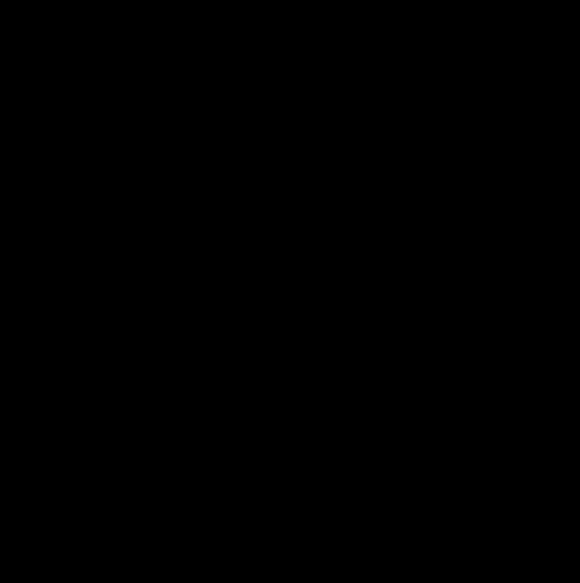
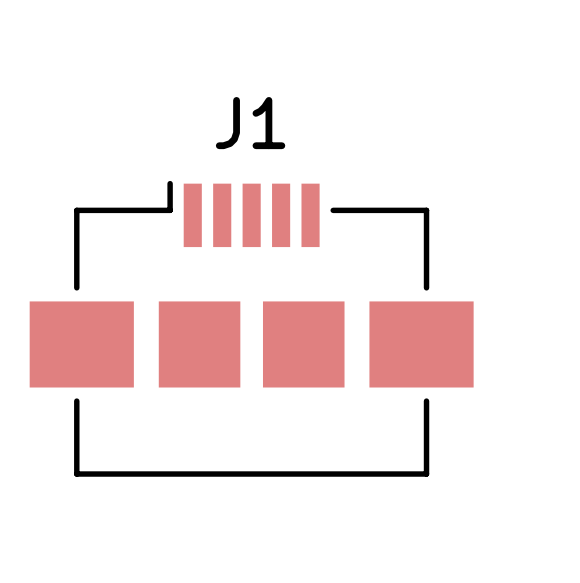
J1: none -> (251, 328)

